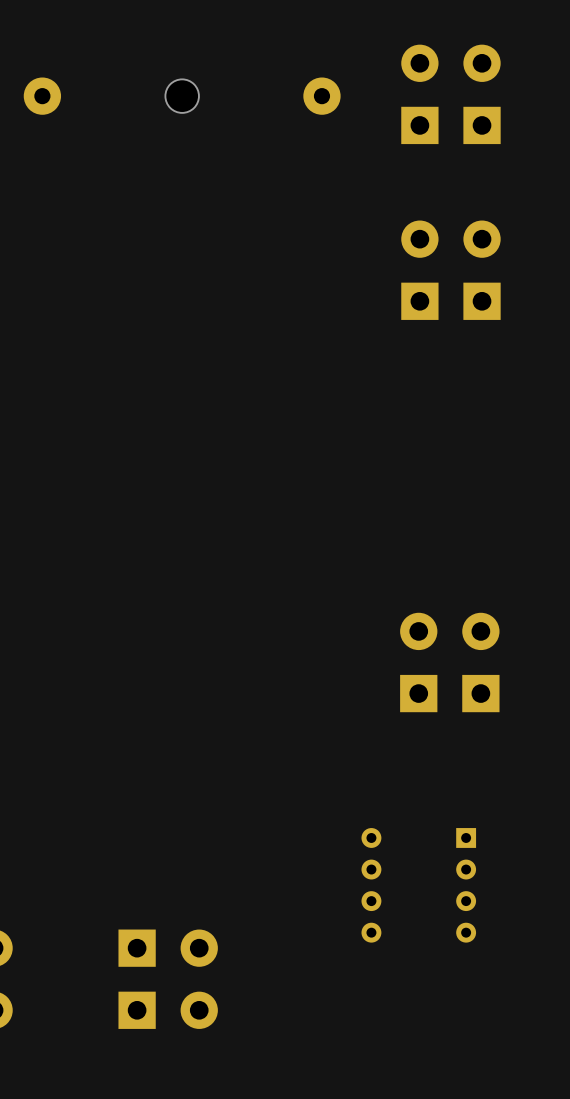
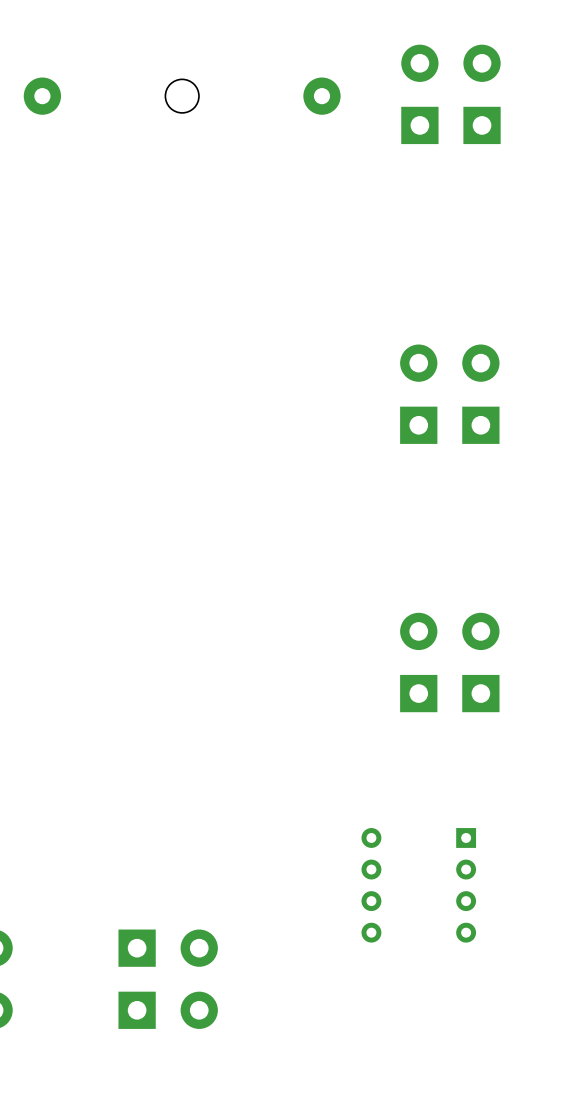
part position: (450, 270) -> (449, 394)

